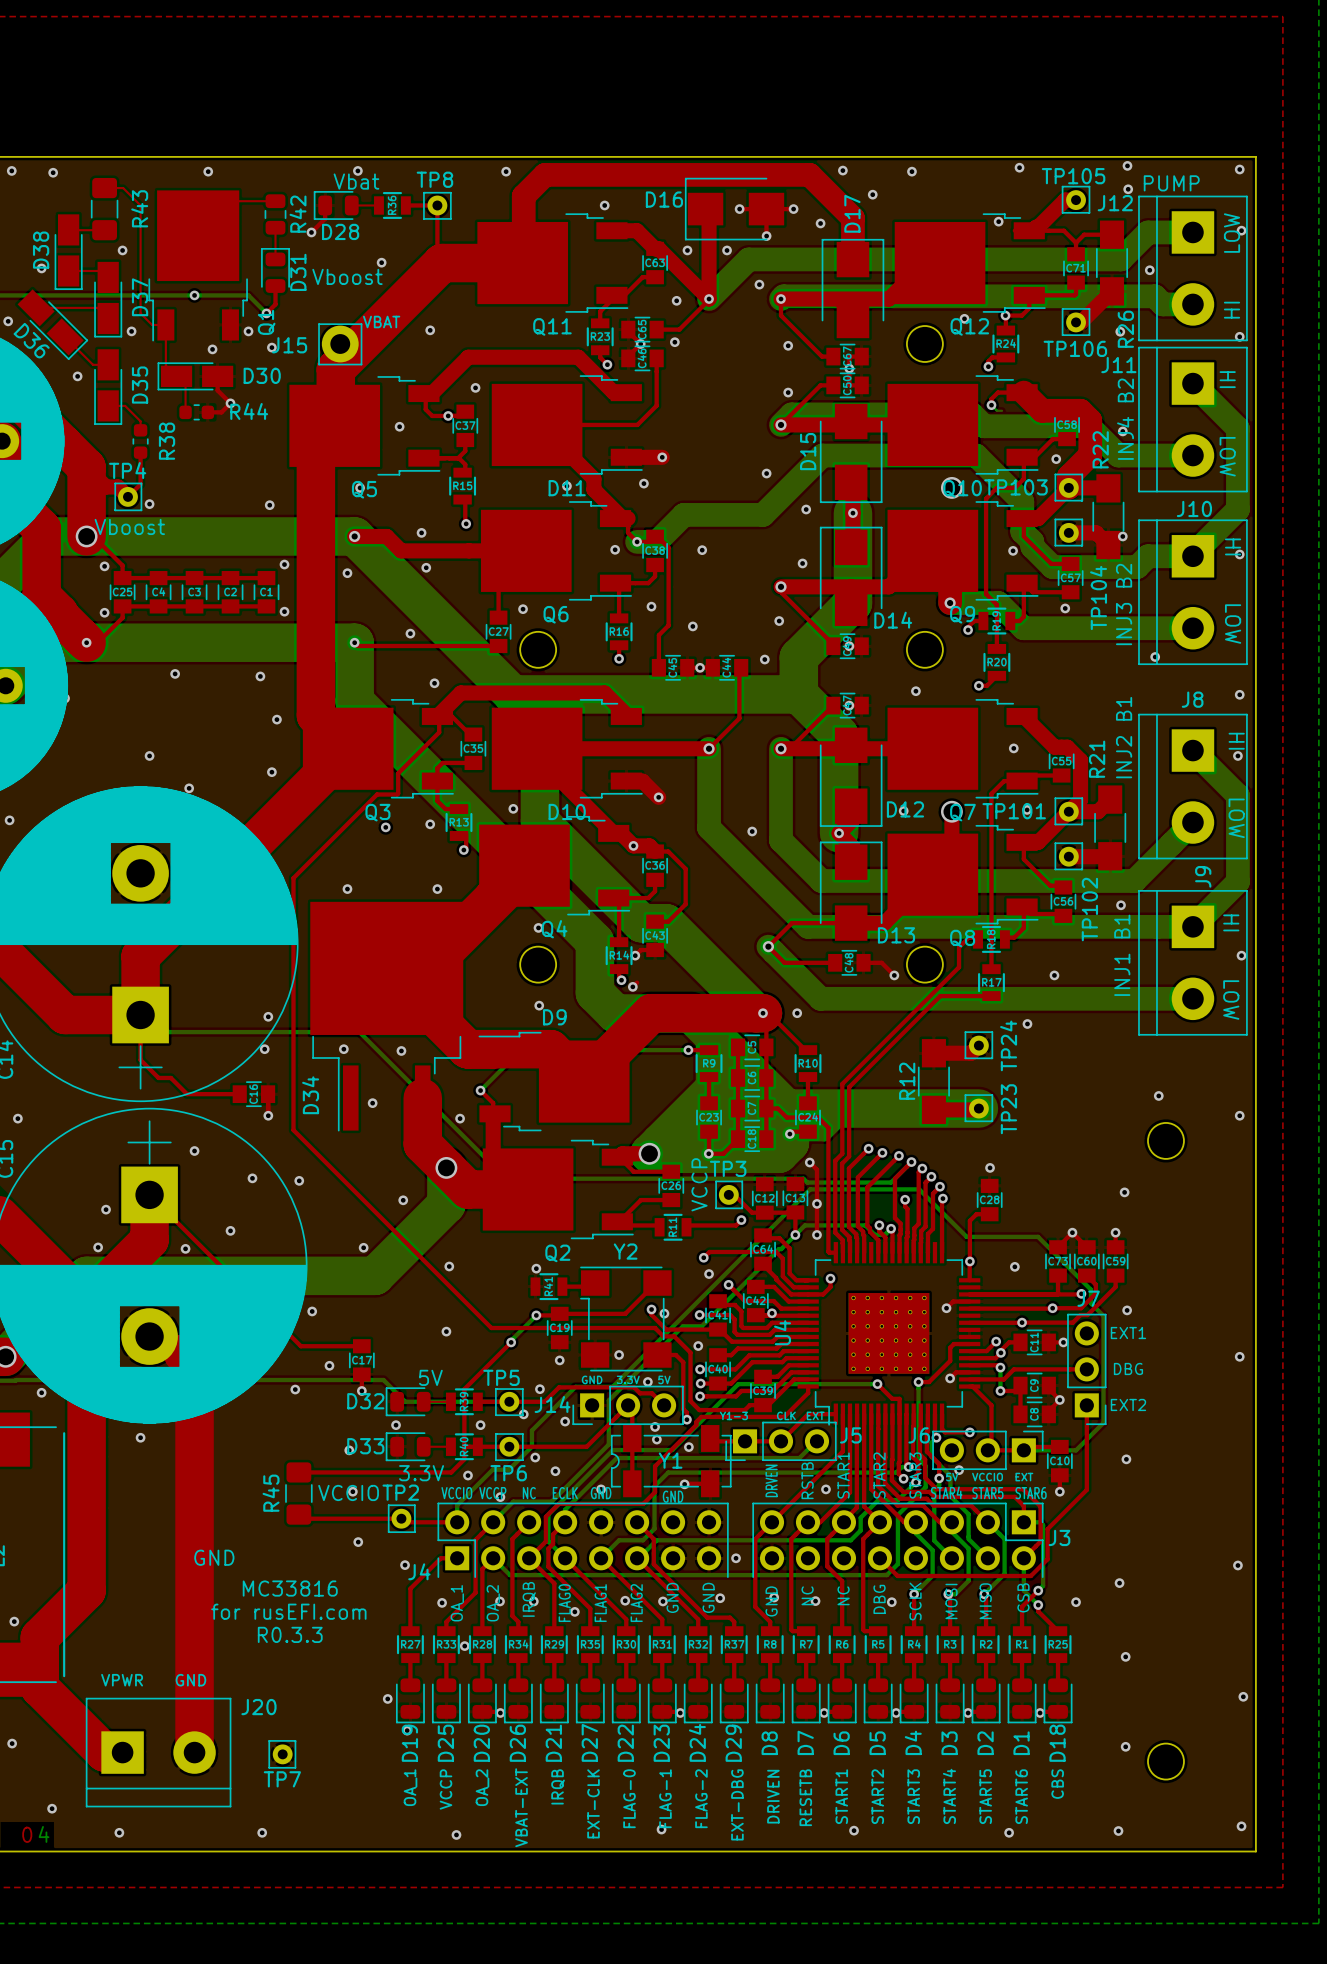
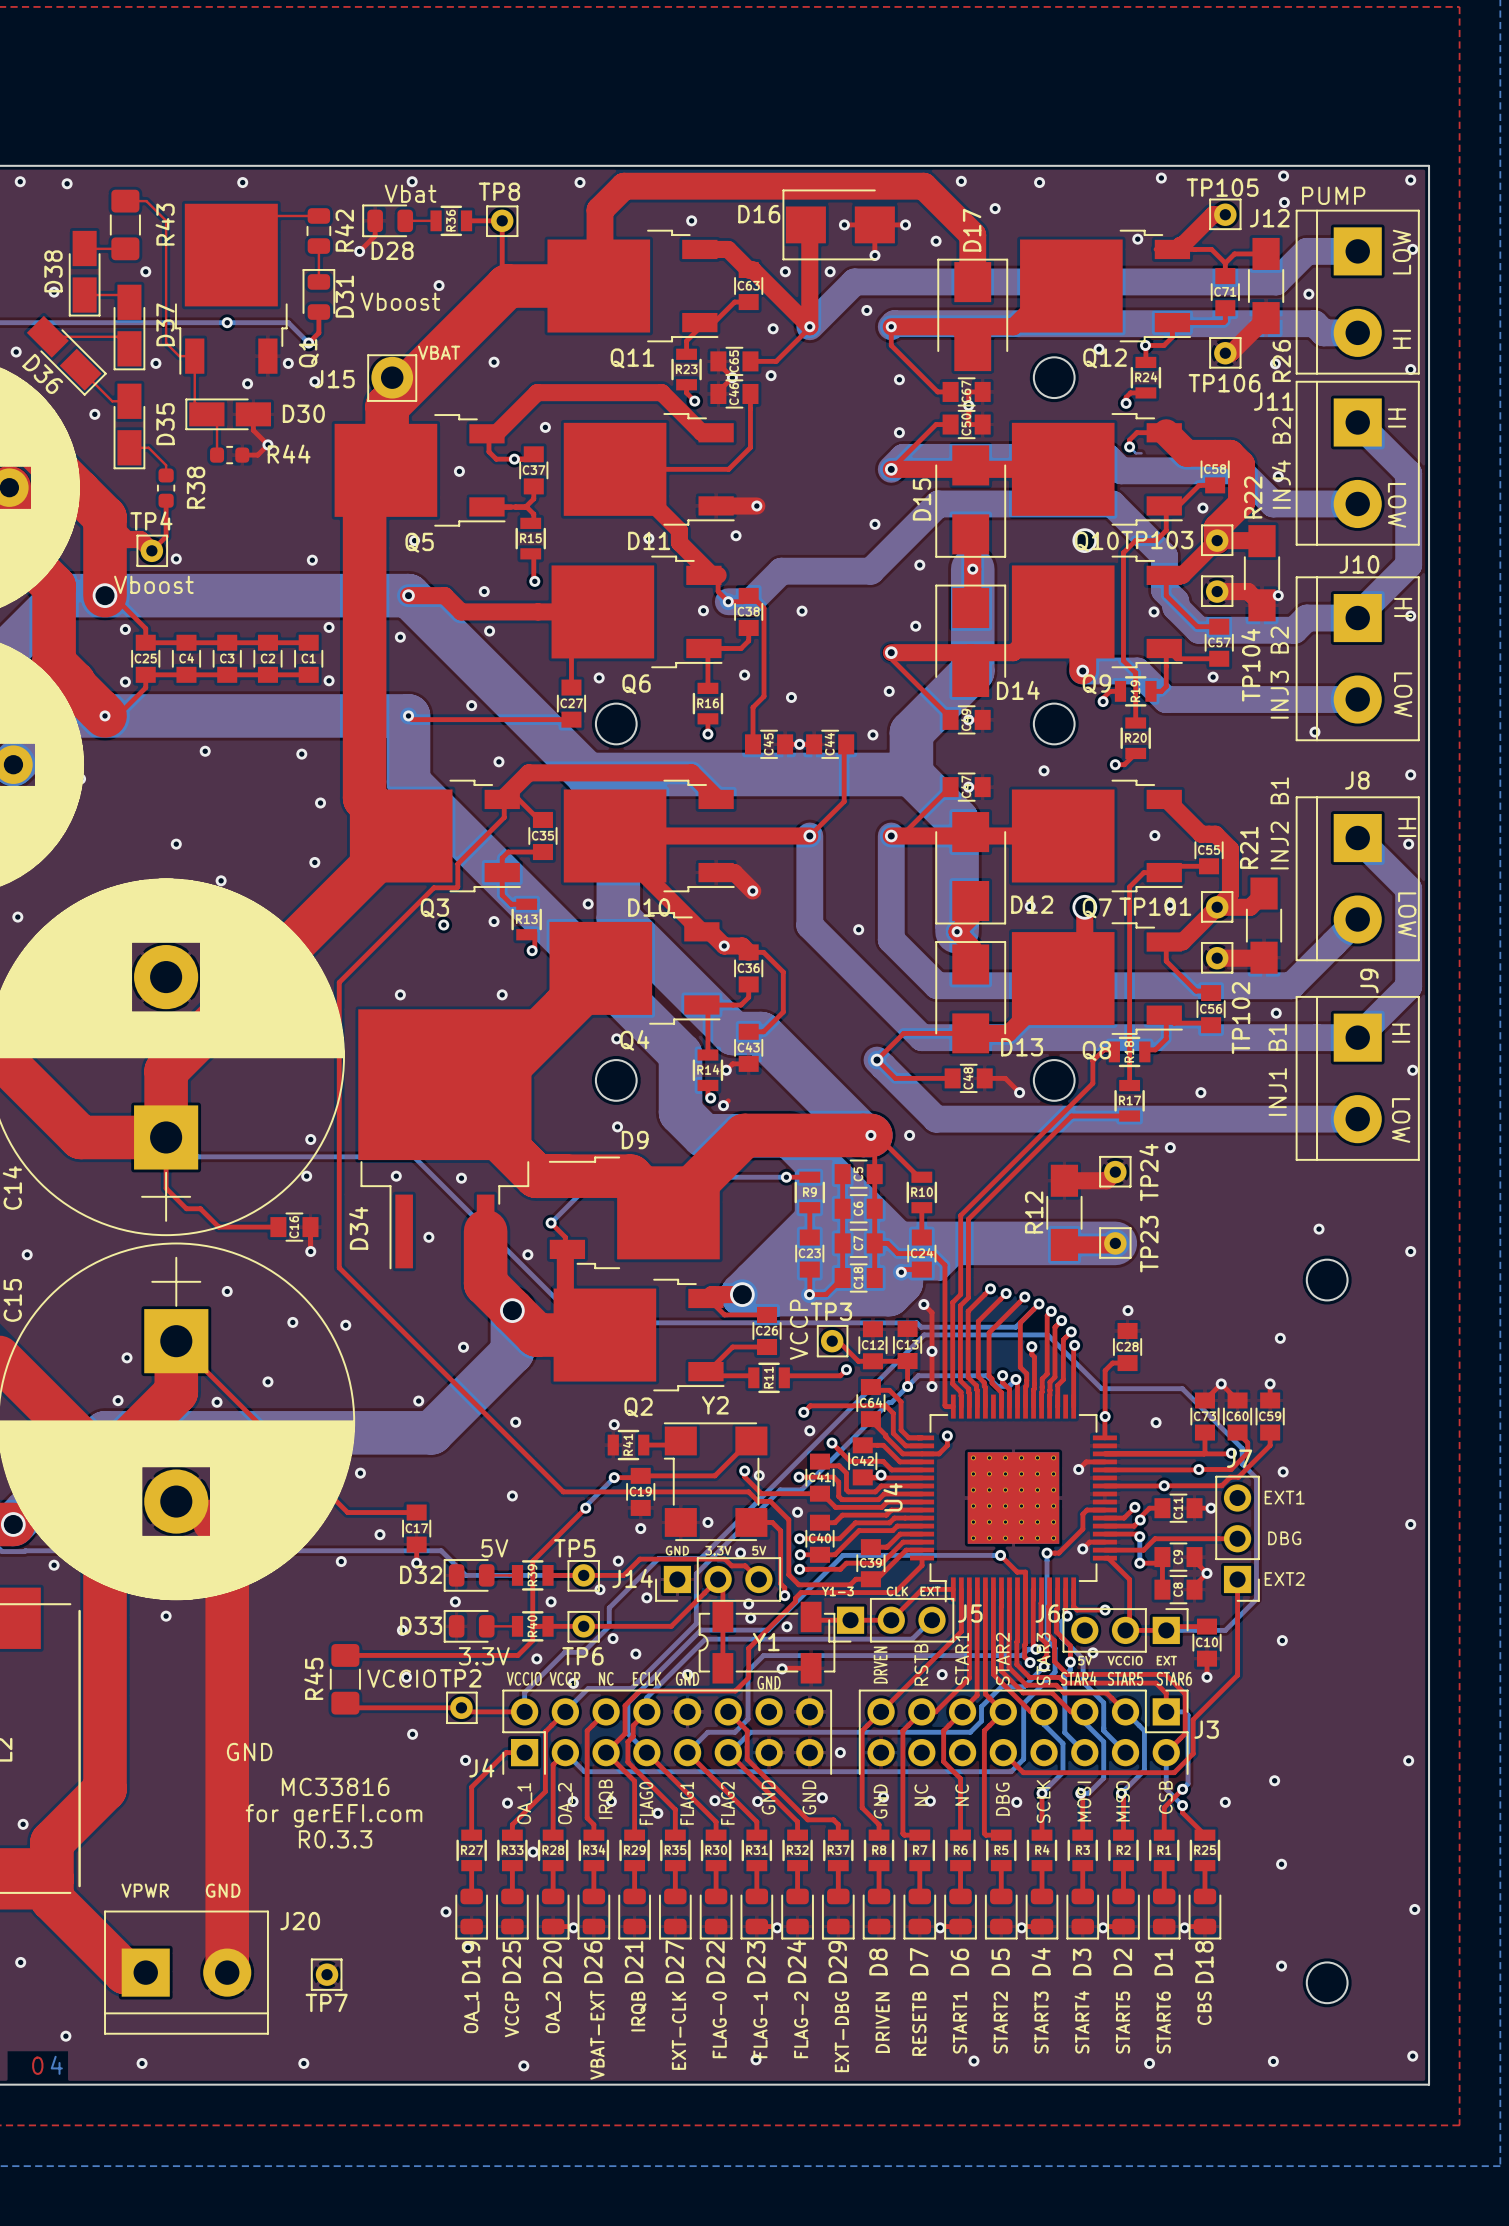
text: for rusEFI.com (288, 1611) -> for gerEFI.com (334, 1815)

